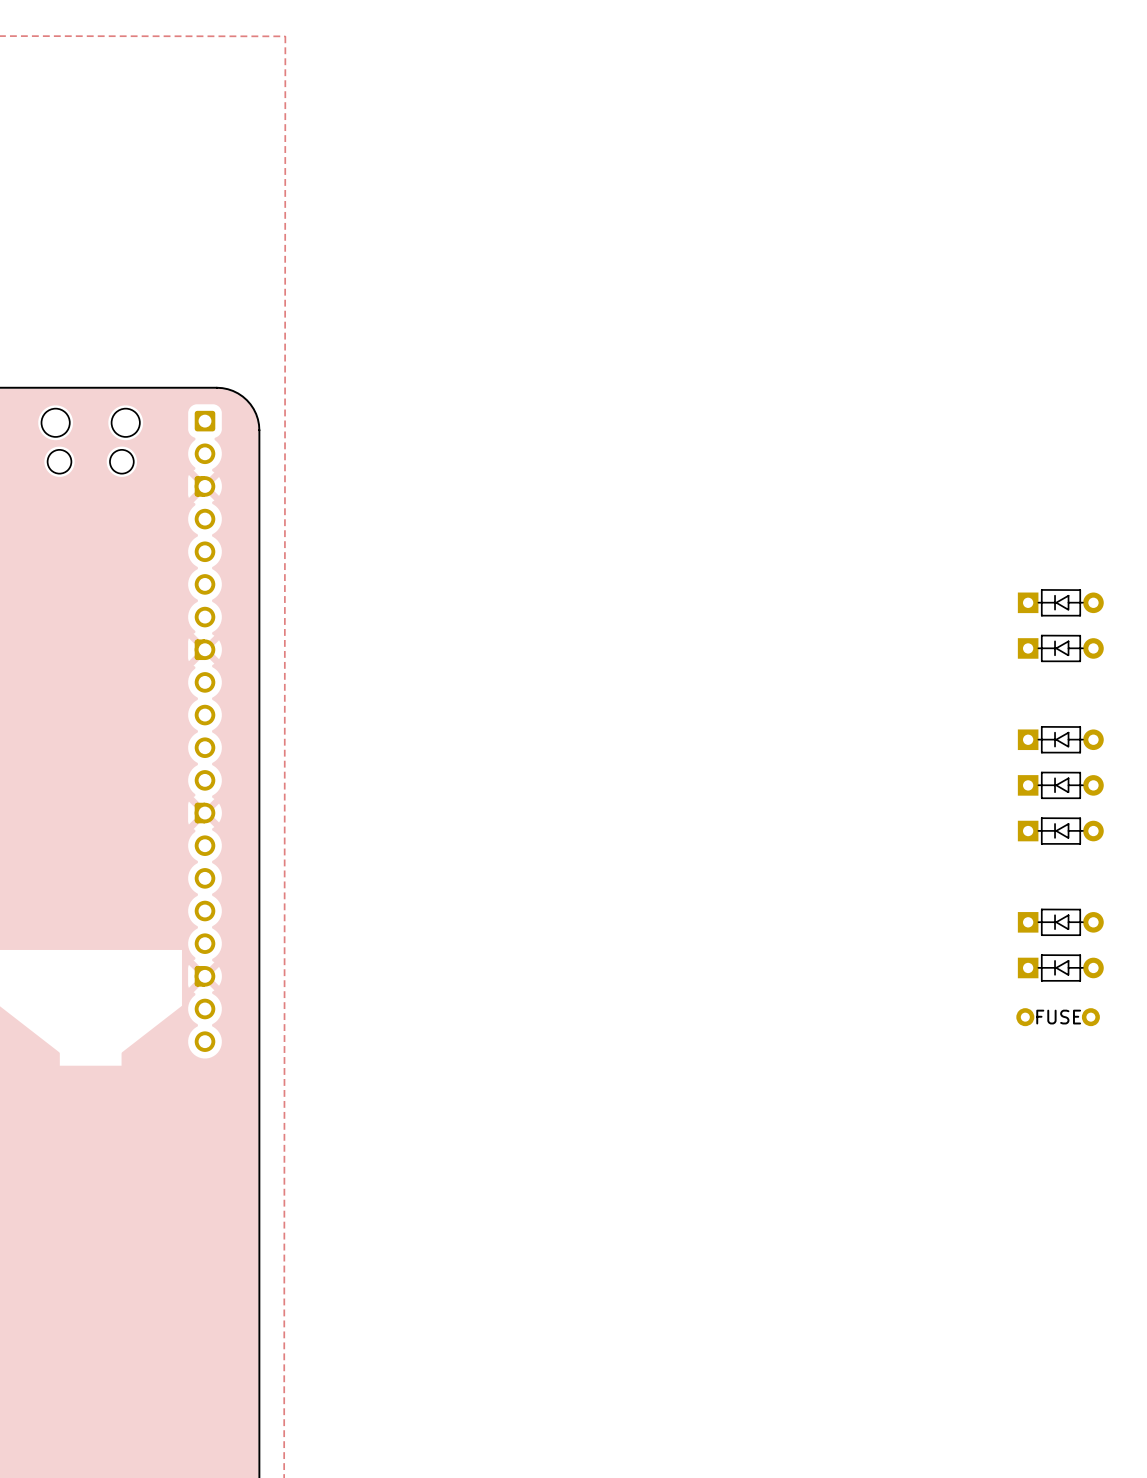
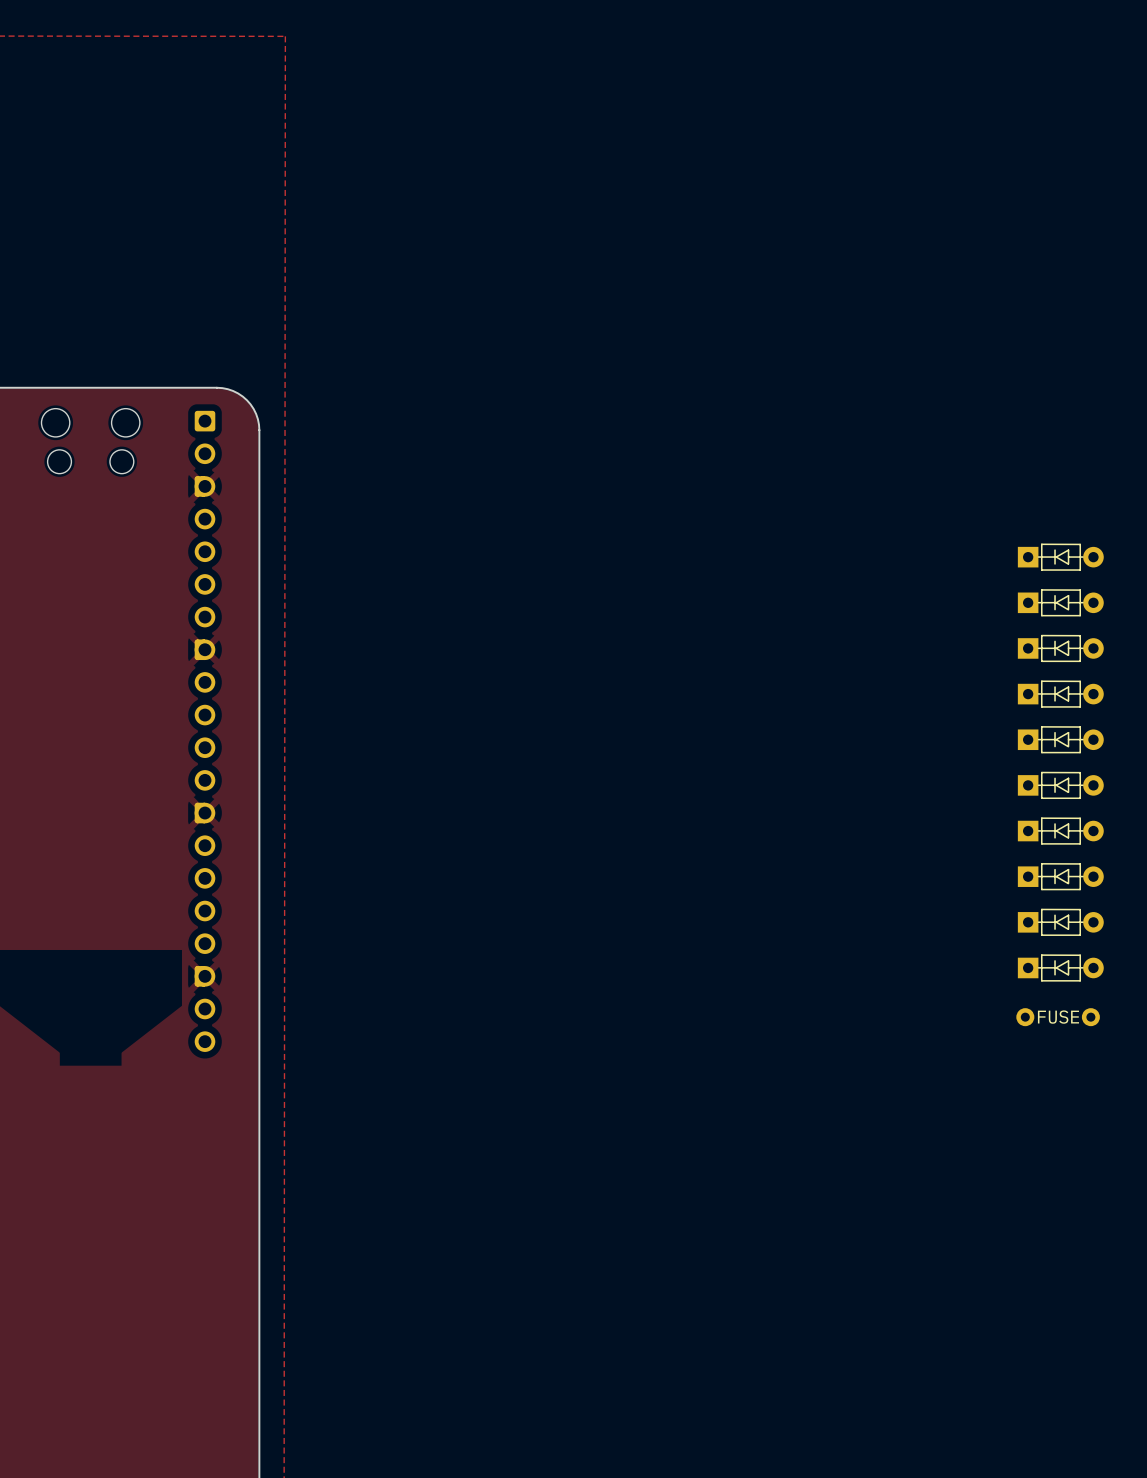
part: none -> (1060, 557)
part: none -> (1060, 694)
part: none -> (1060, 876)

